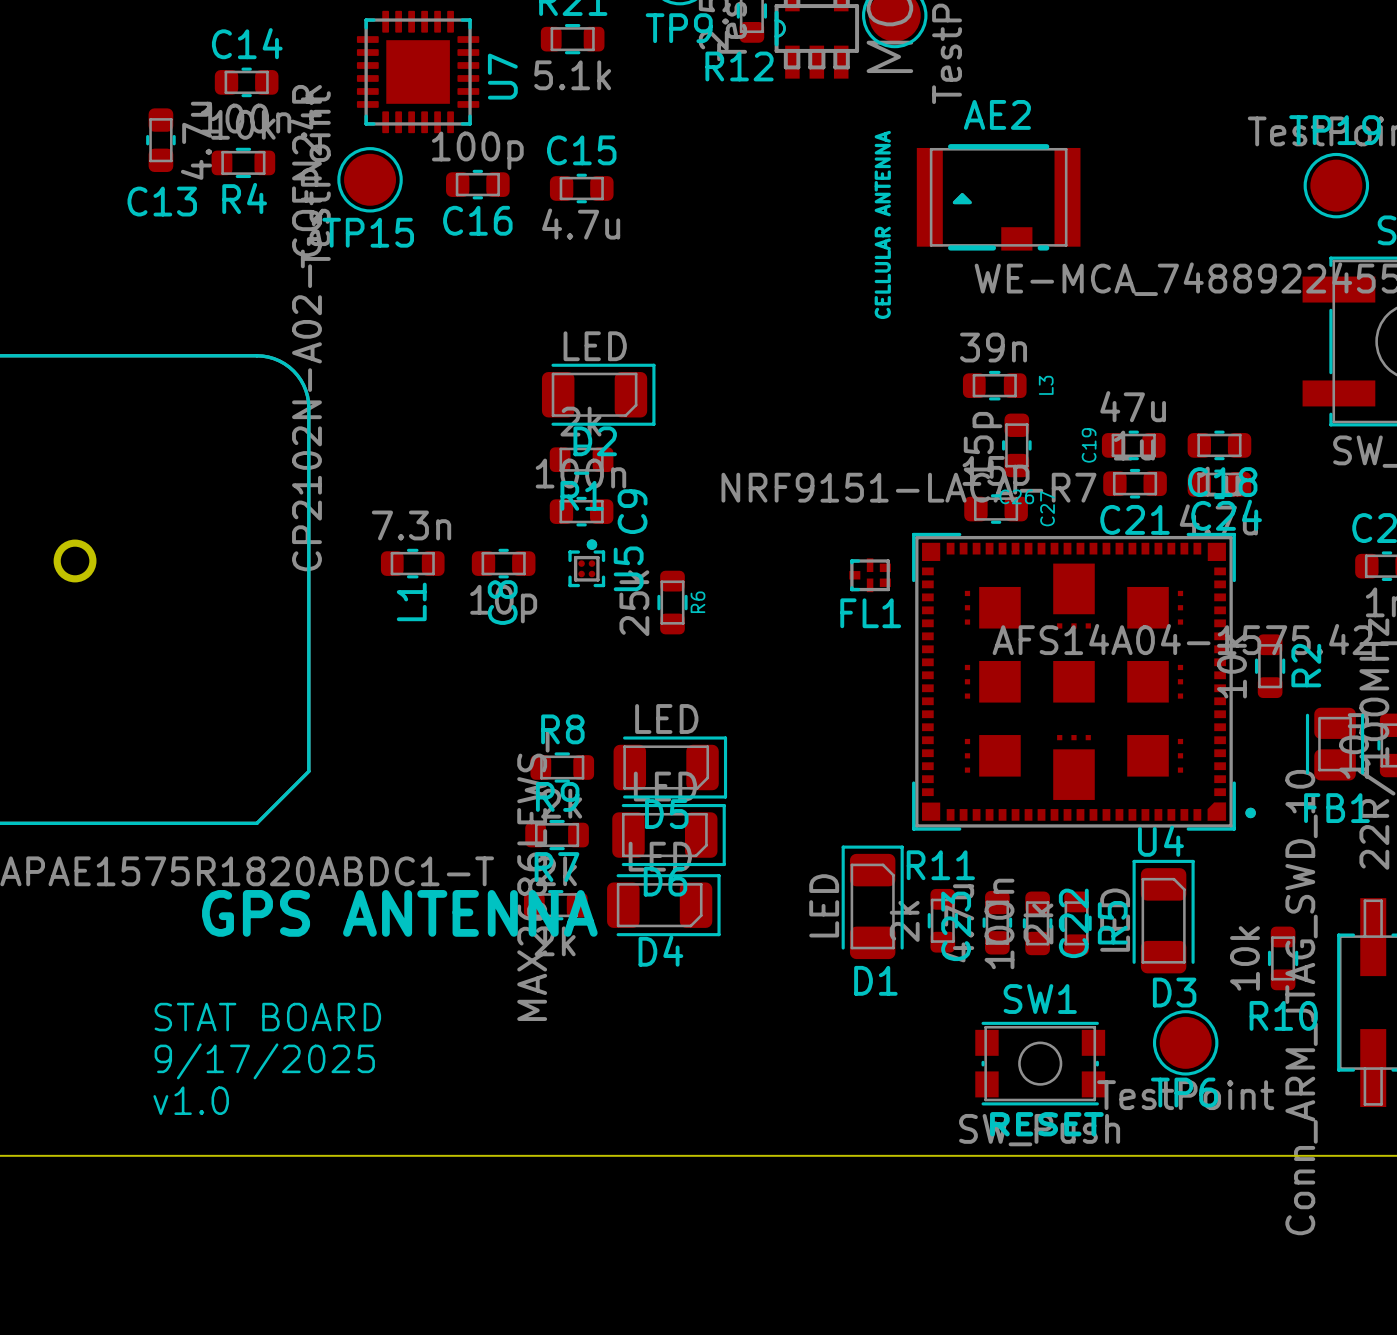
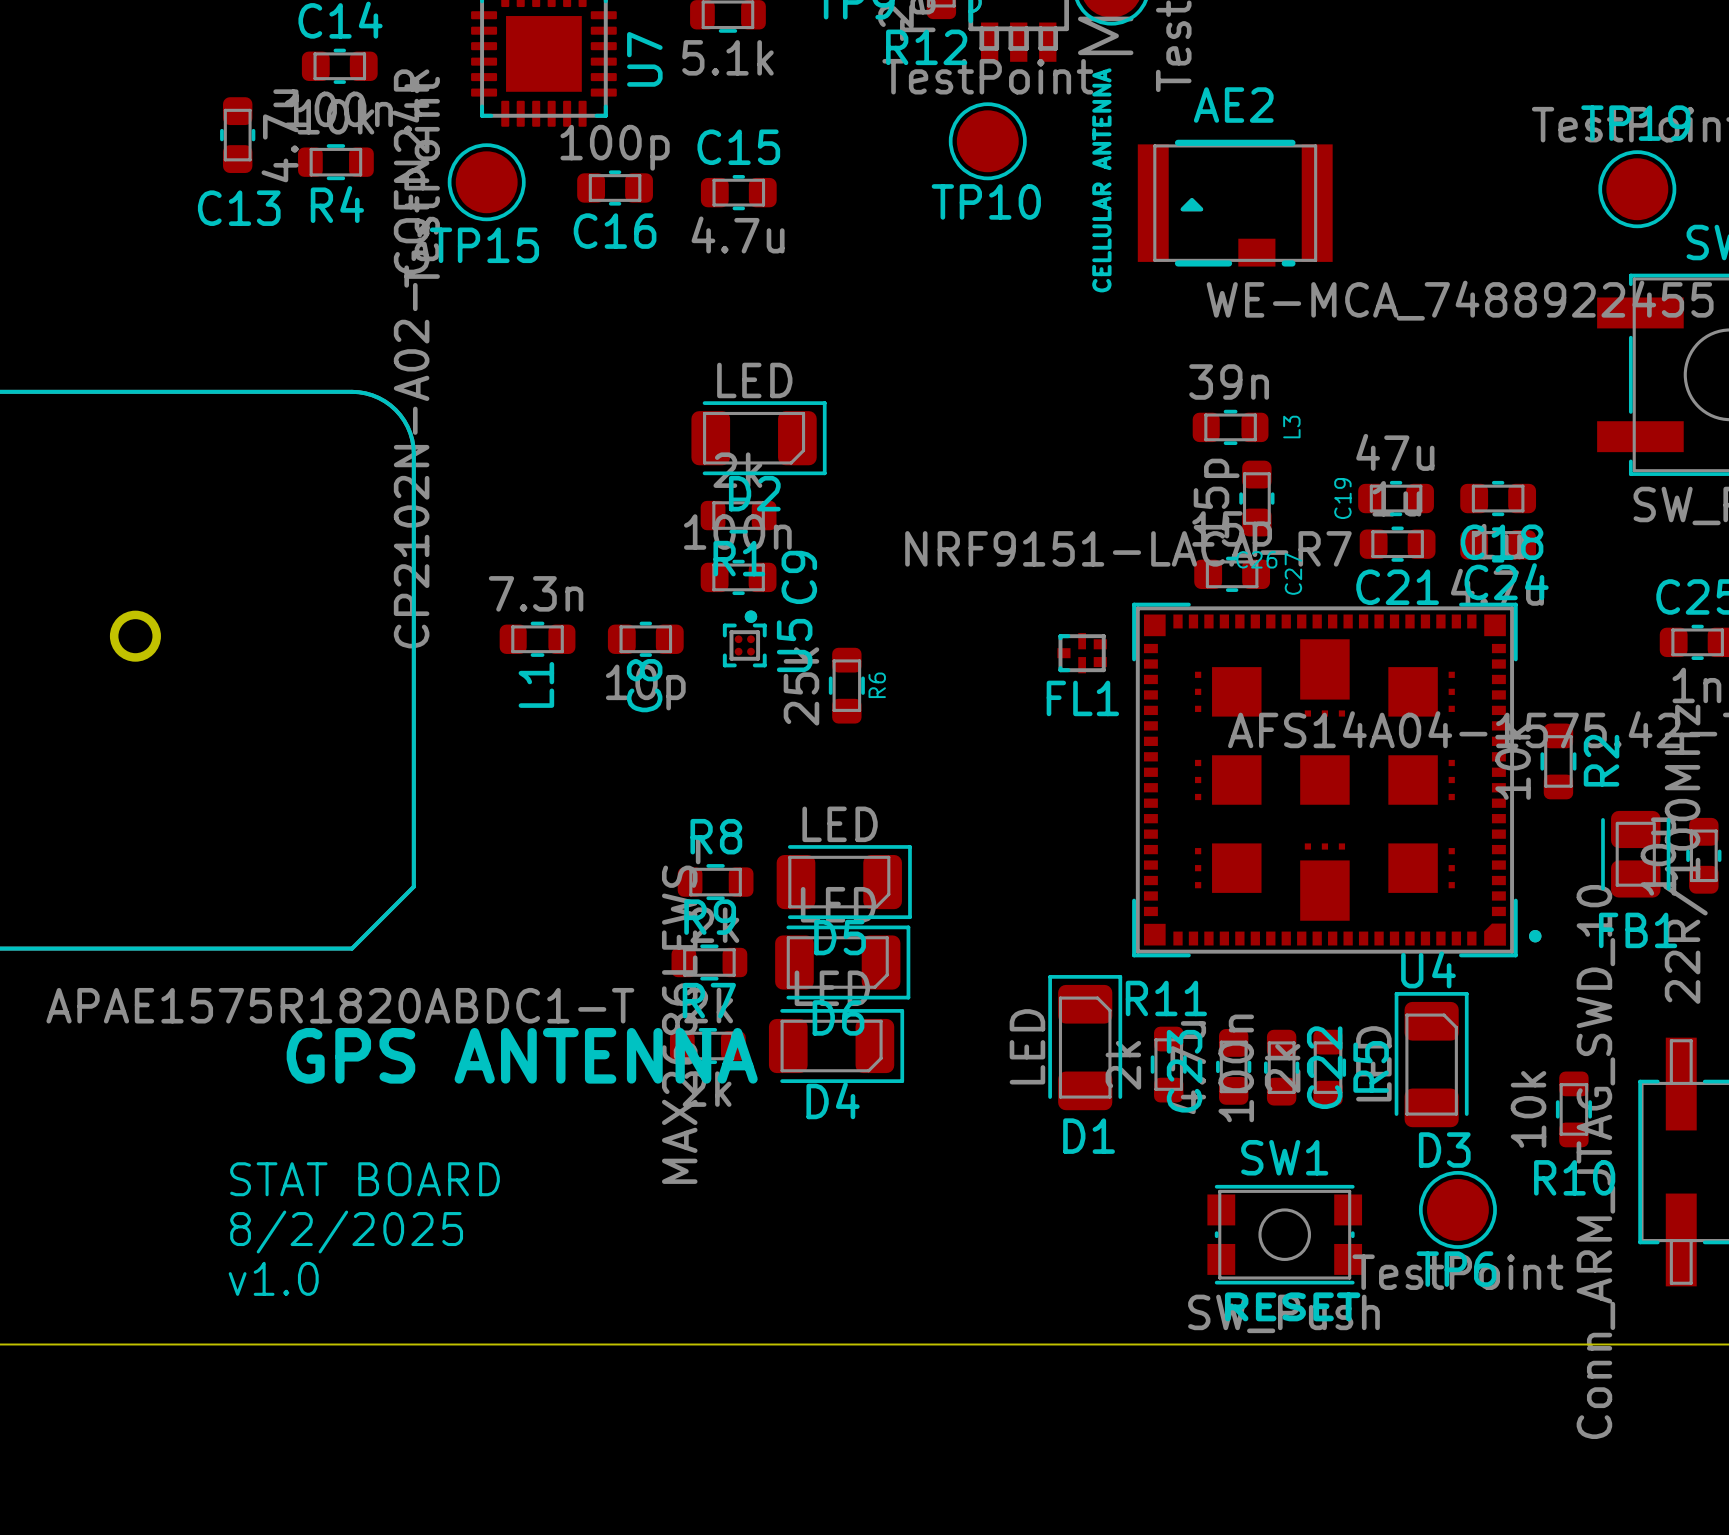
TP10: none -> TestPoint (987, 141)
text position: CELLULAR ANTENNA (882, 224) -> CELLULAR ANTENNA (1101, 180)
text: 9/17/2025 (264, 1061) -> 8/2/2025 (346, 1231)

